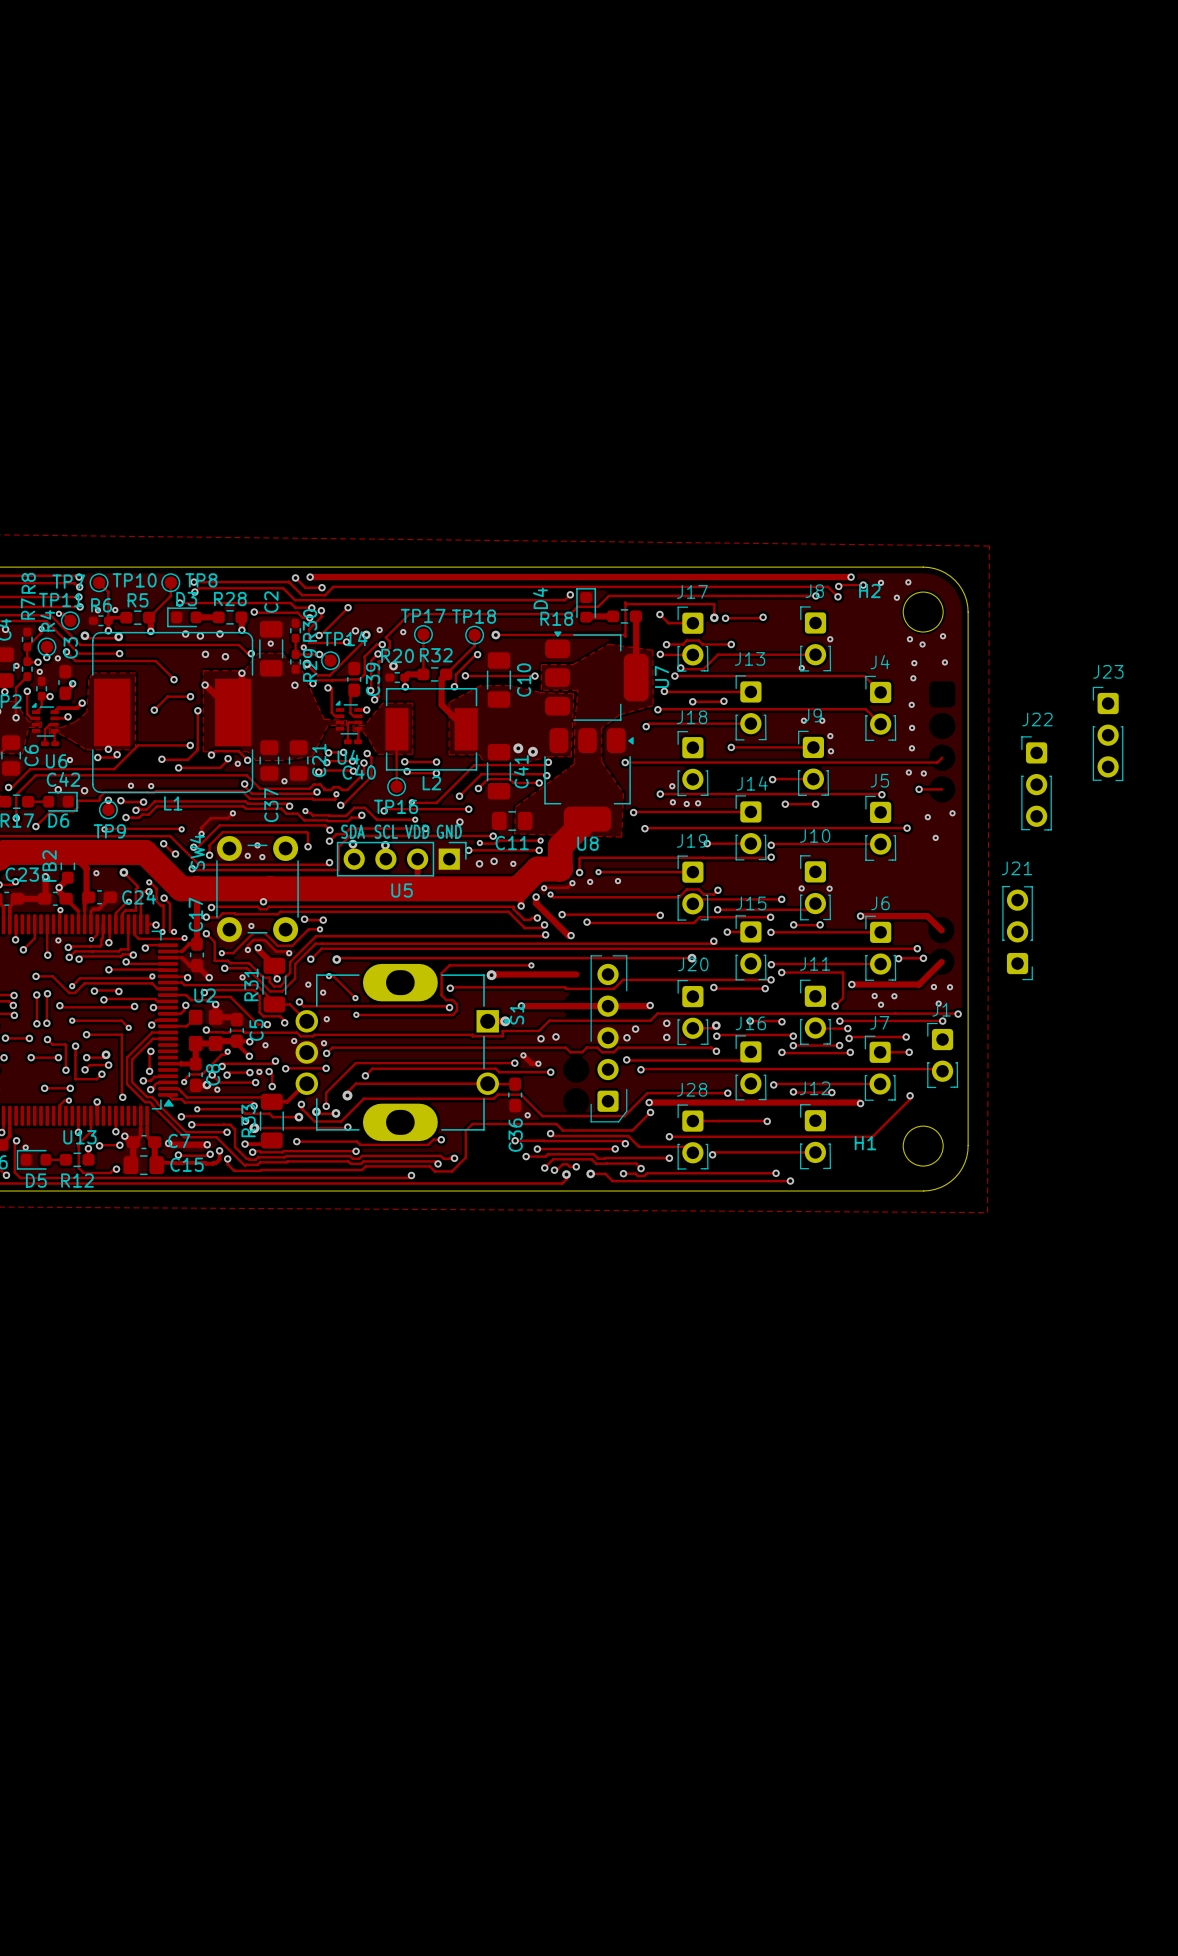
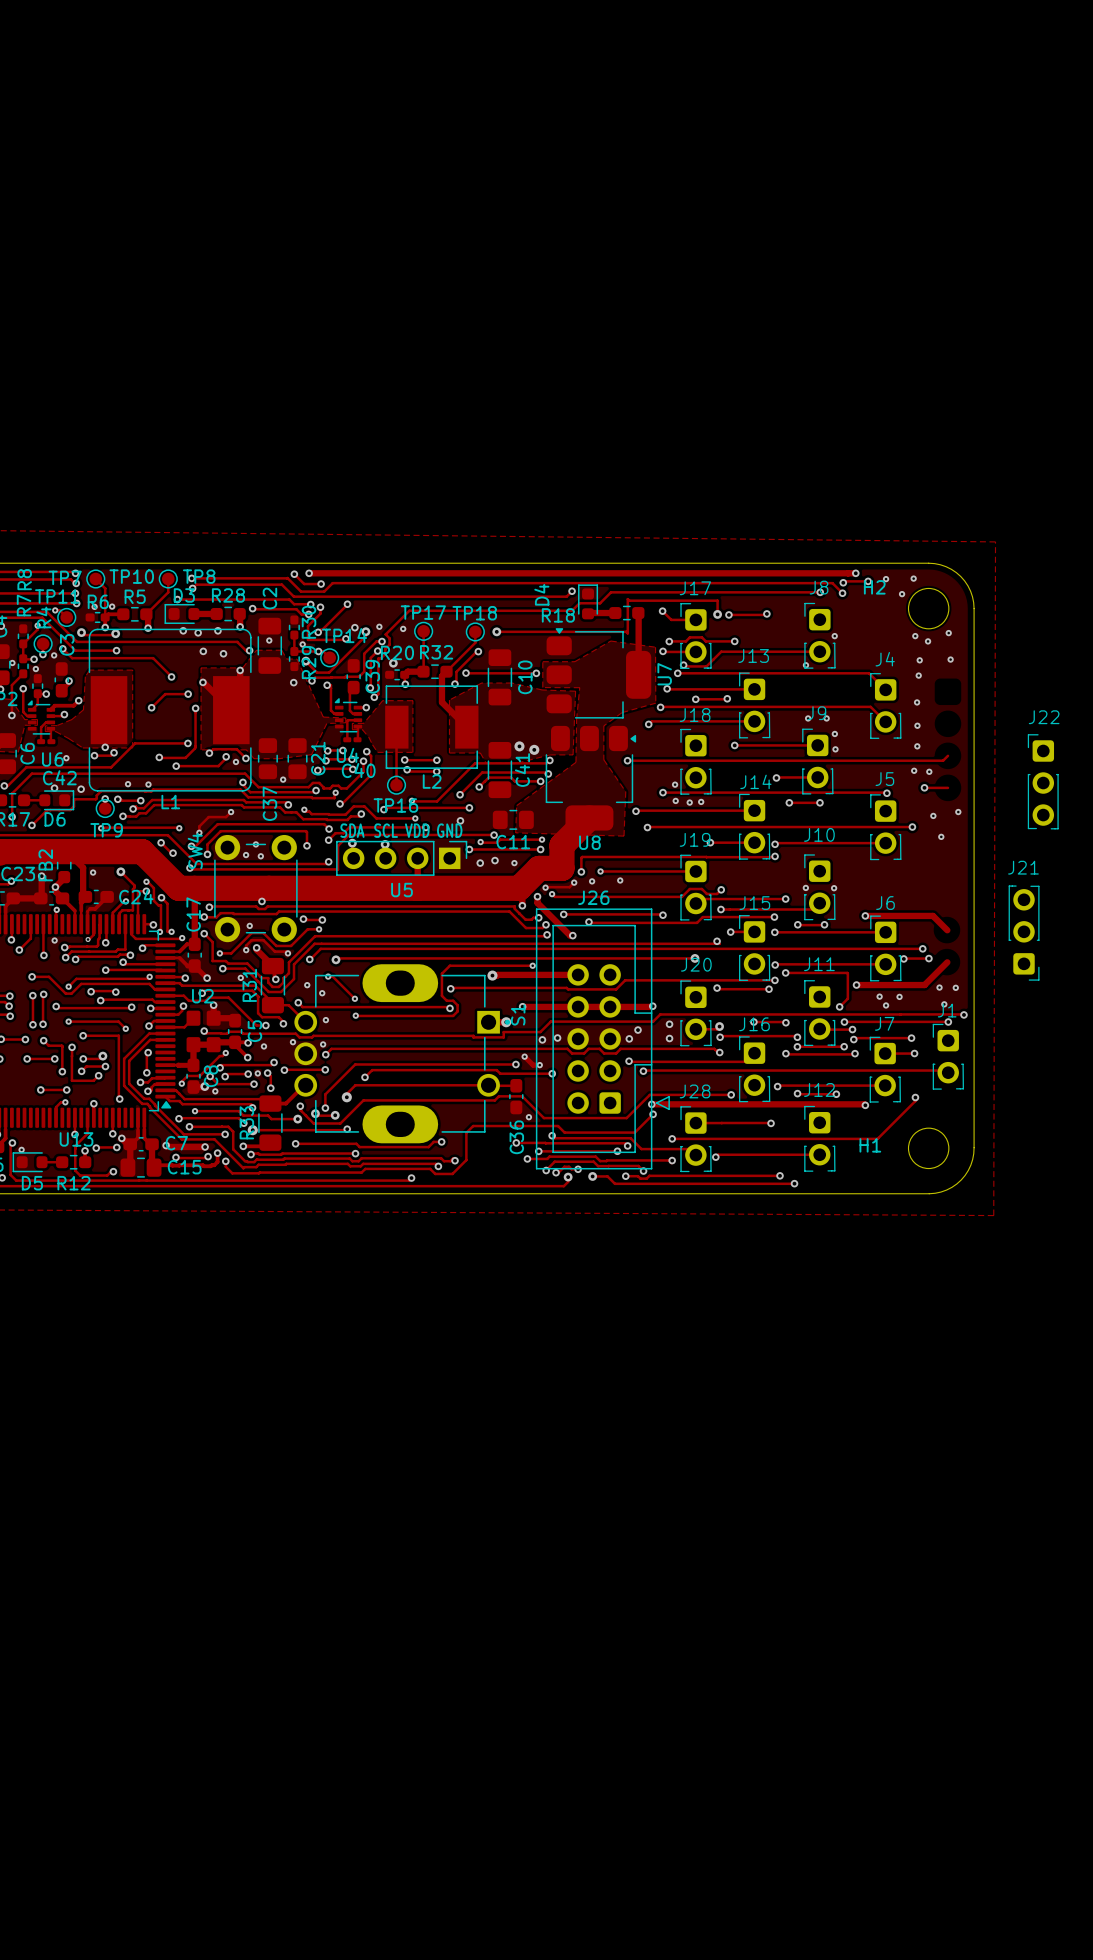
J26: none -> (602, 1038)
part: (608, 1038) -> none

